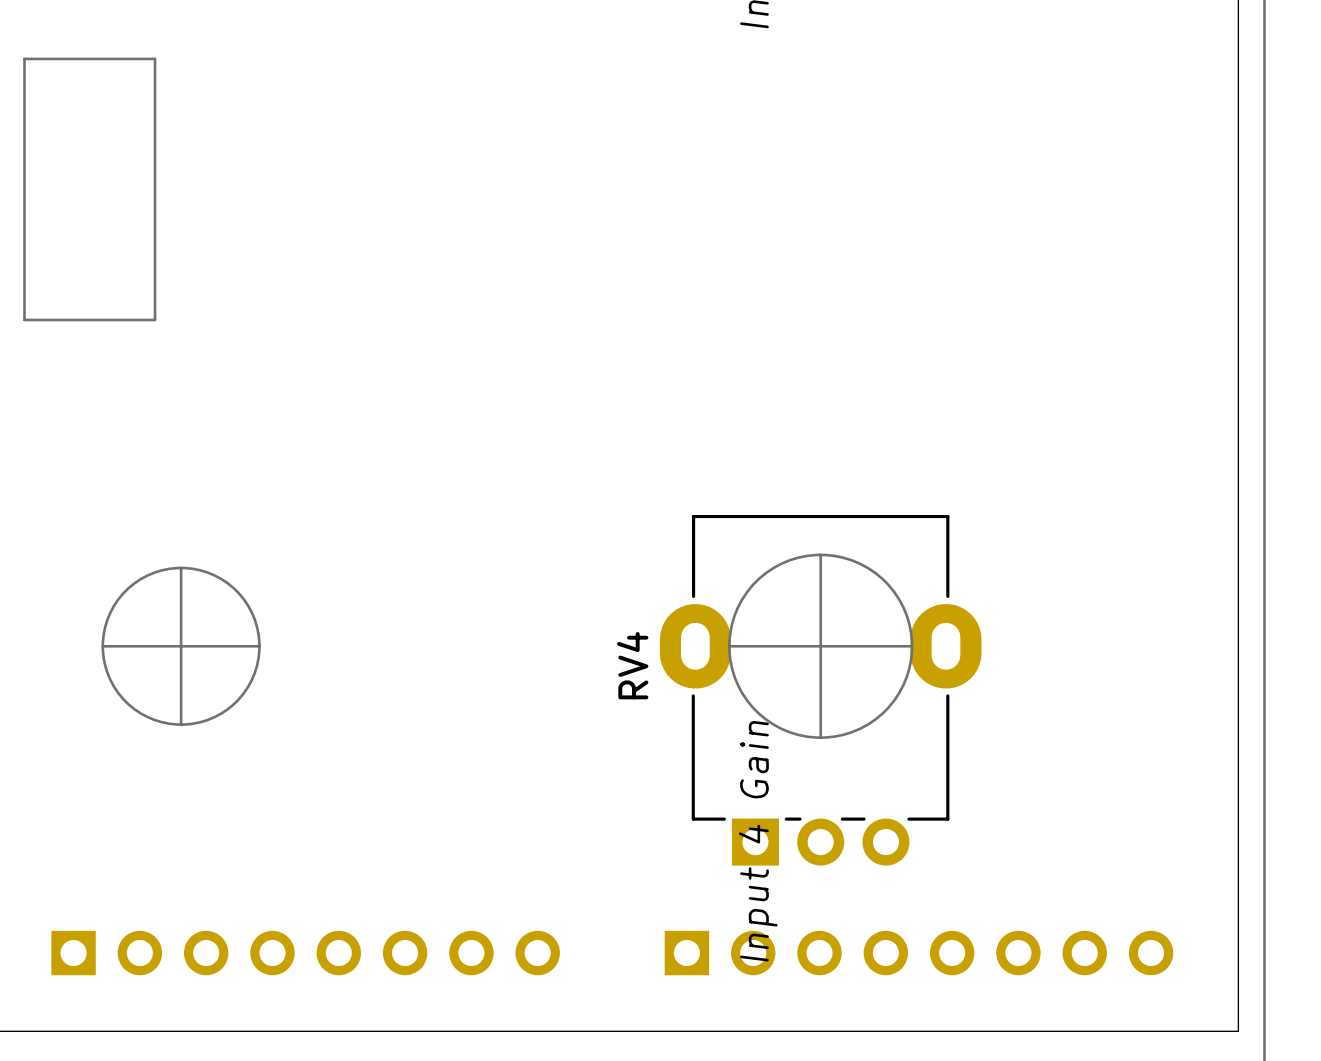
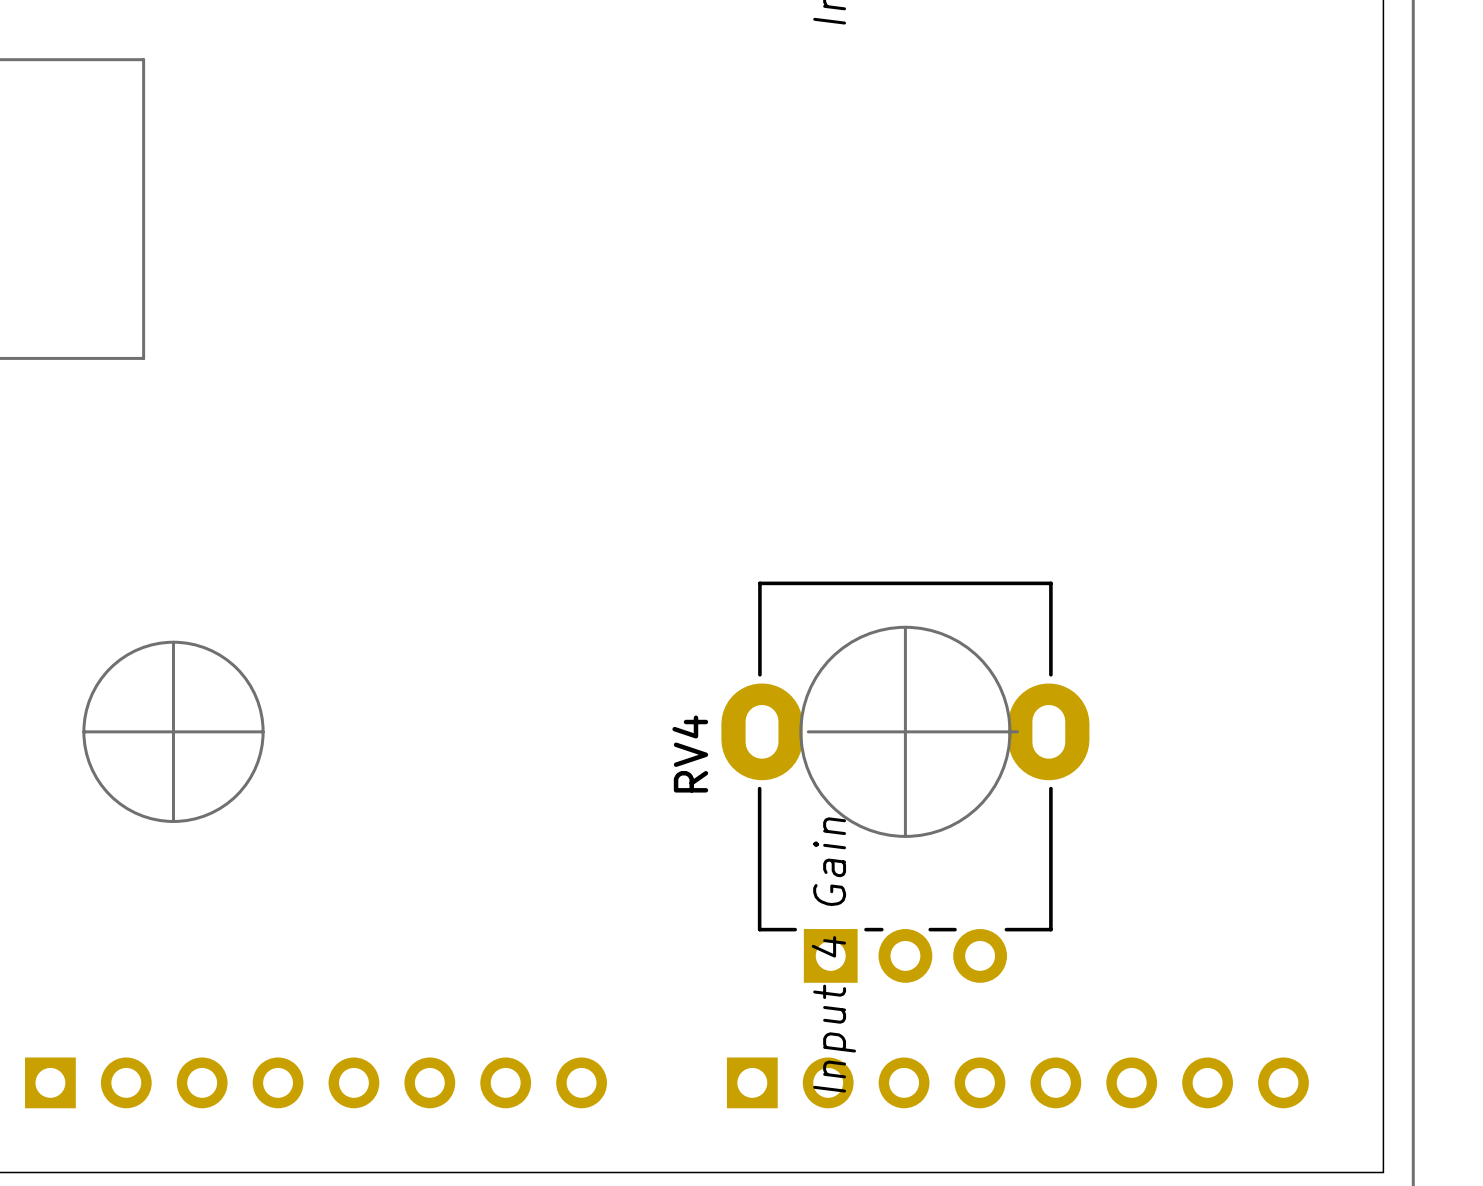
line: (729, 646) (735, 646) -> (1009, 731) (1017, 731)

